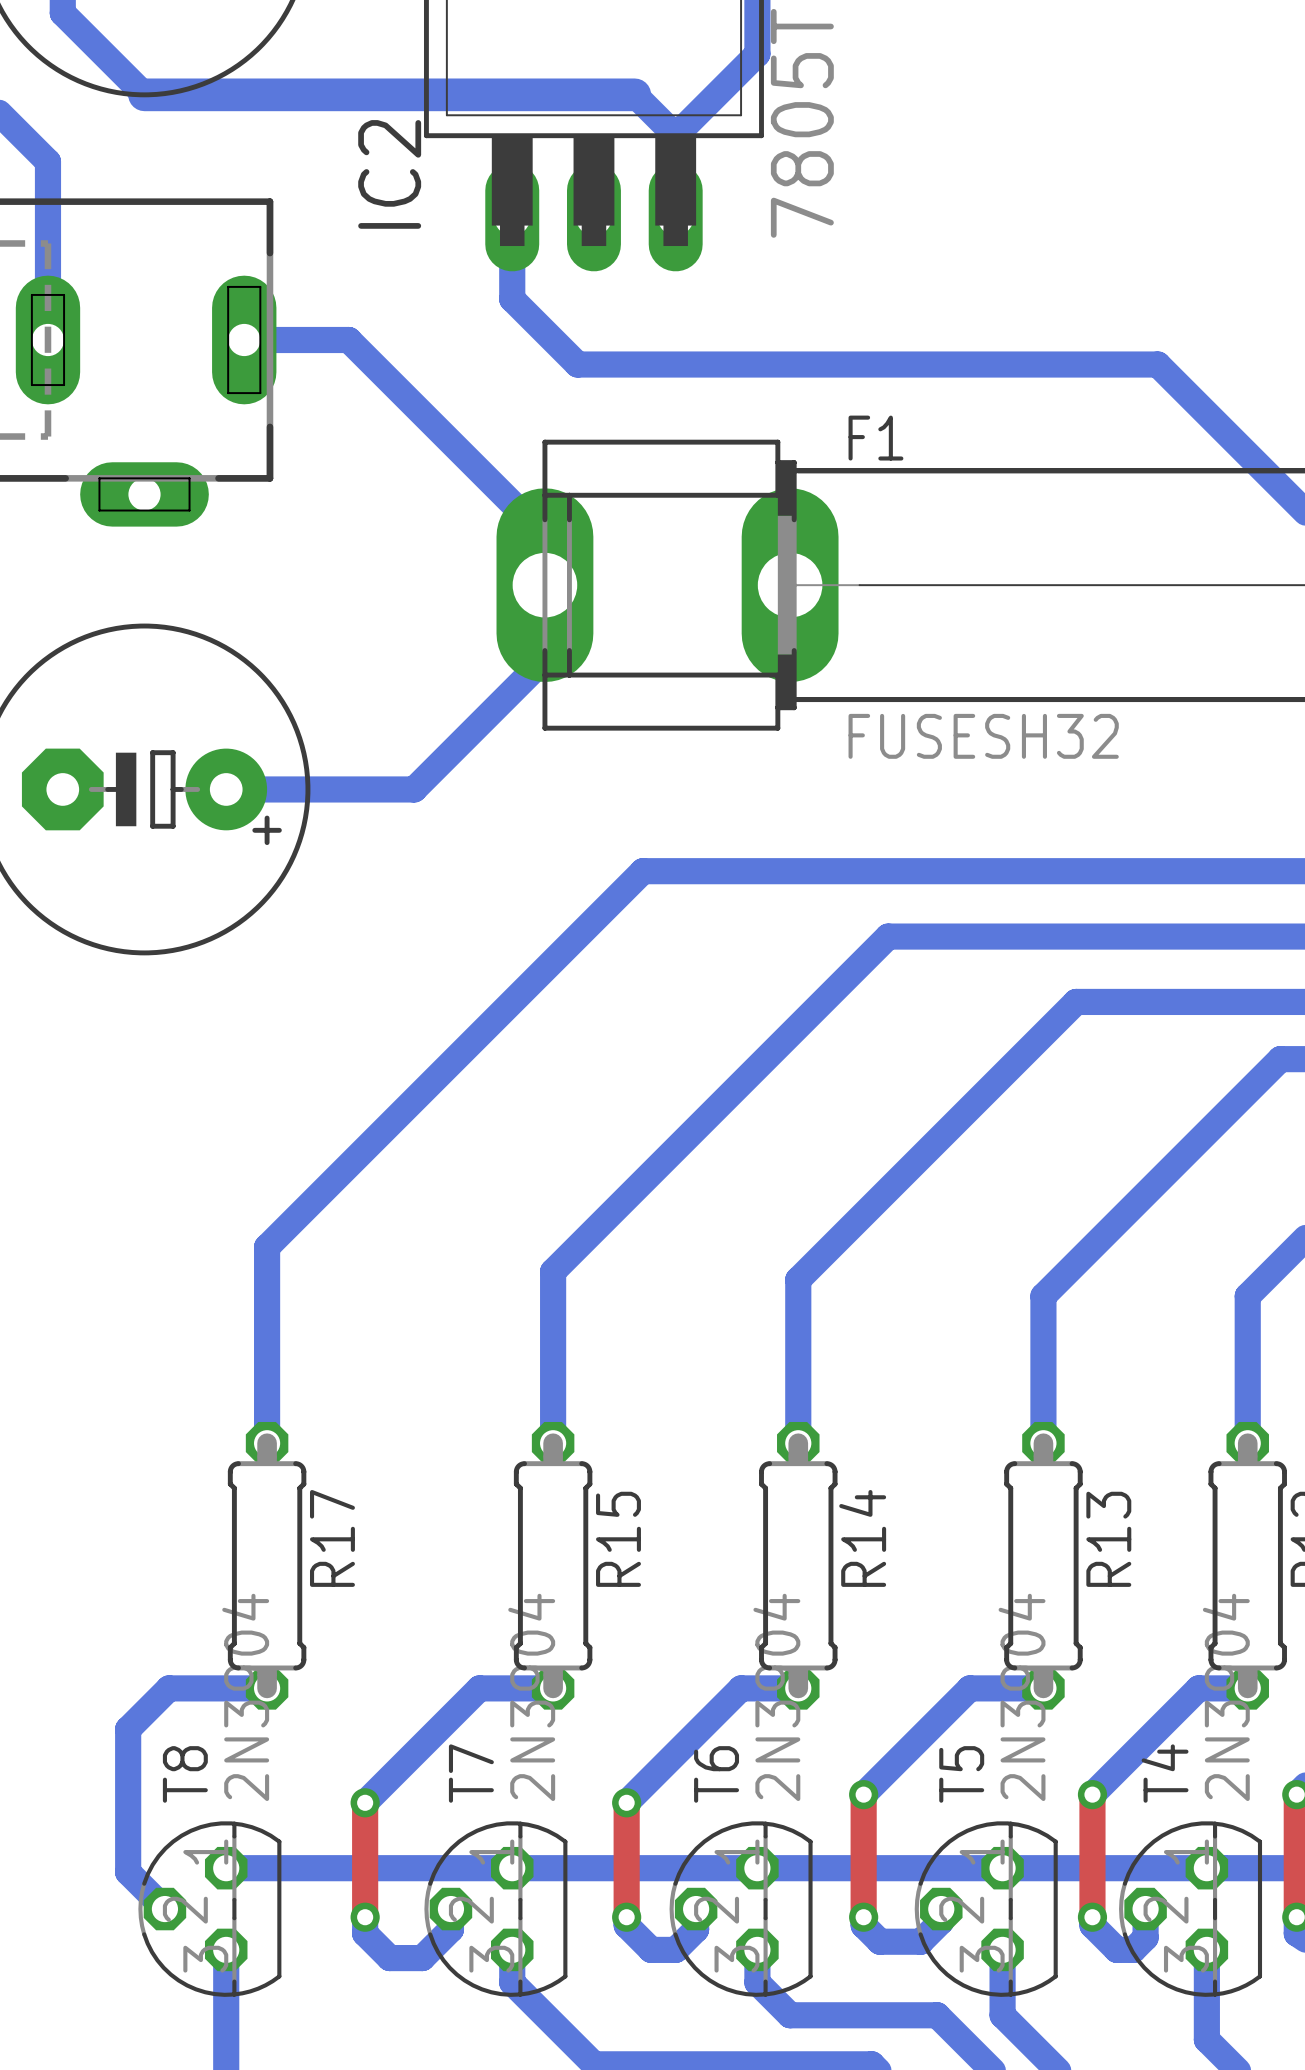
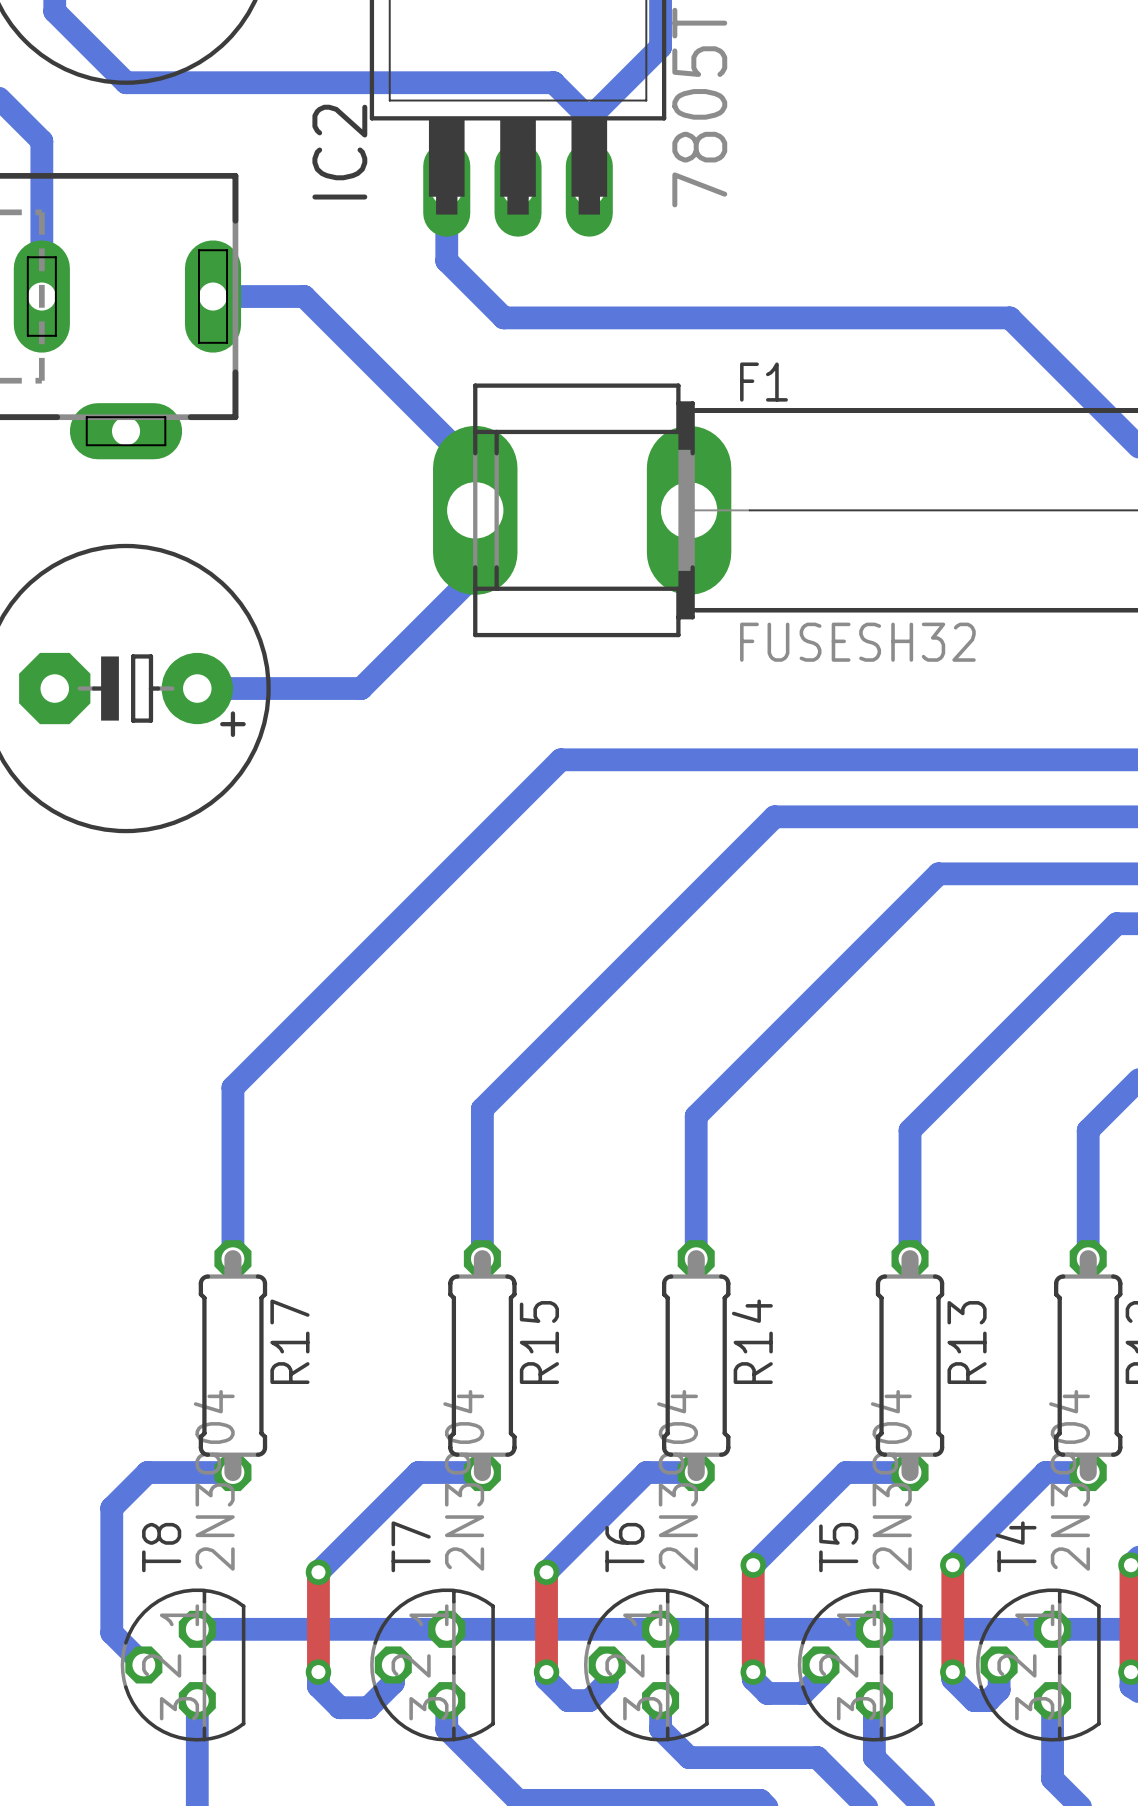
bottom track width: thick (144, 94) (634, 94) -> thin (126, 82) (553, 82)

